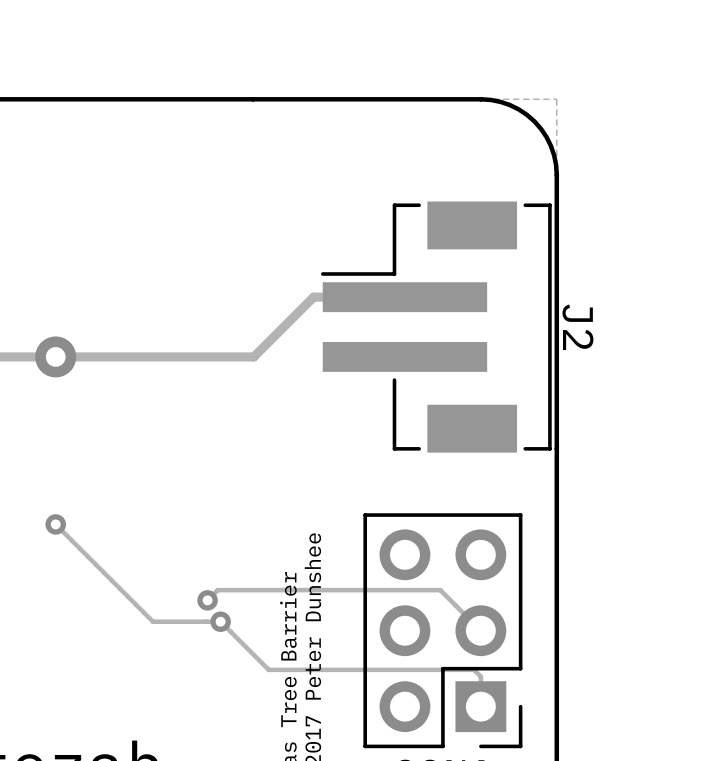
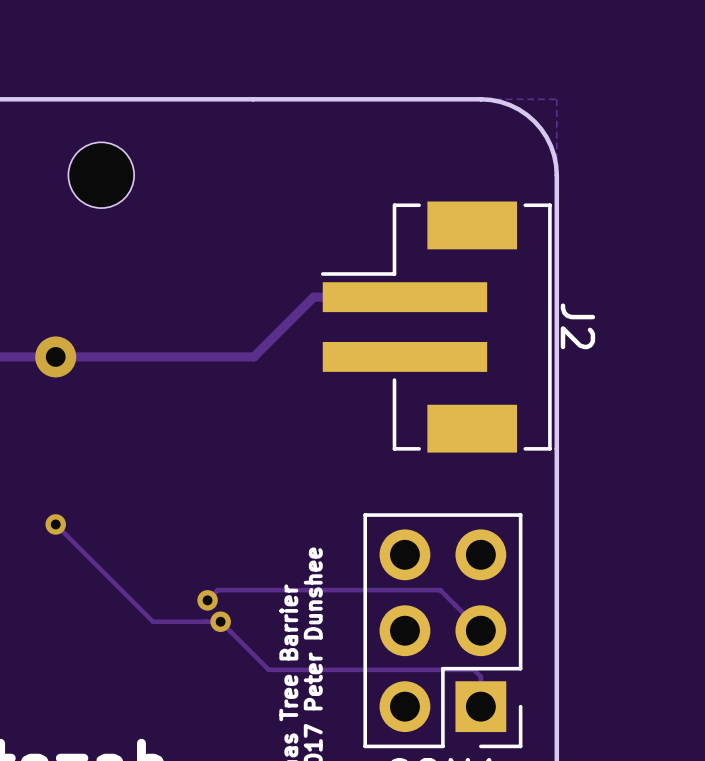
part: none -> (101, 175)

